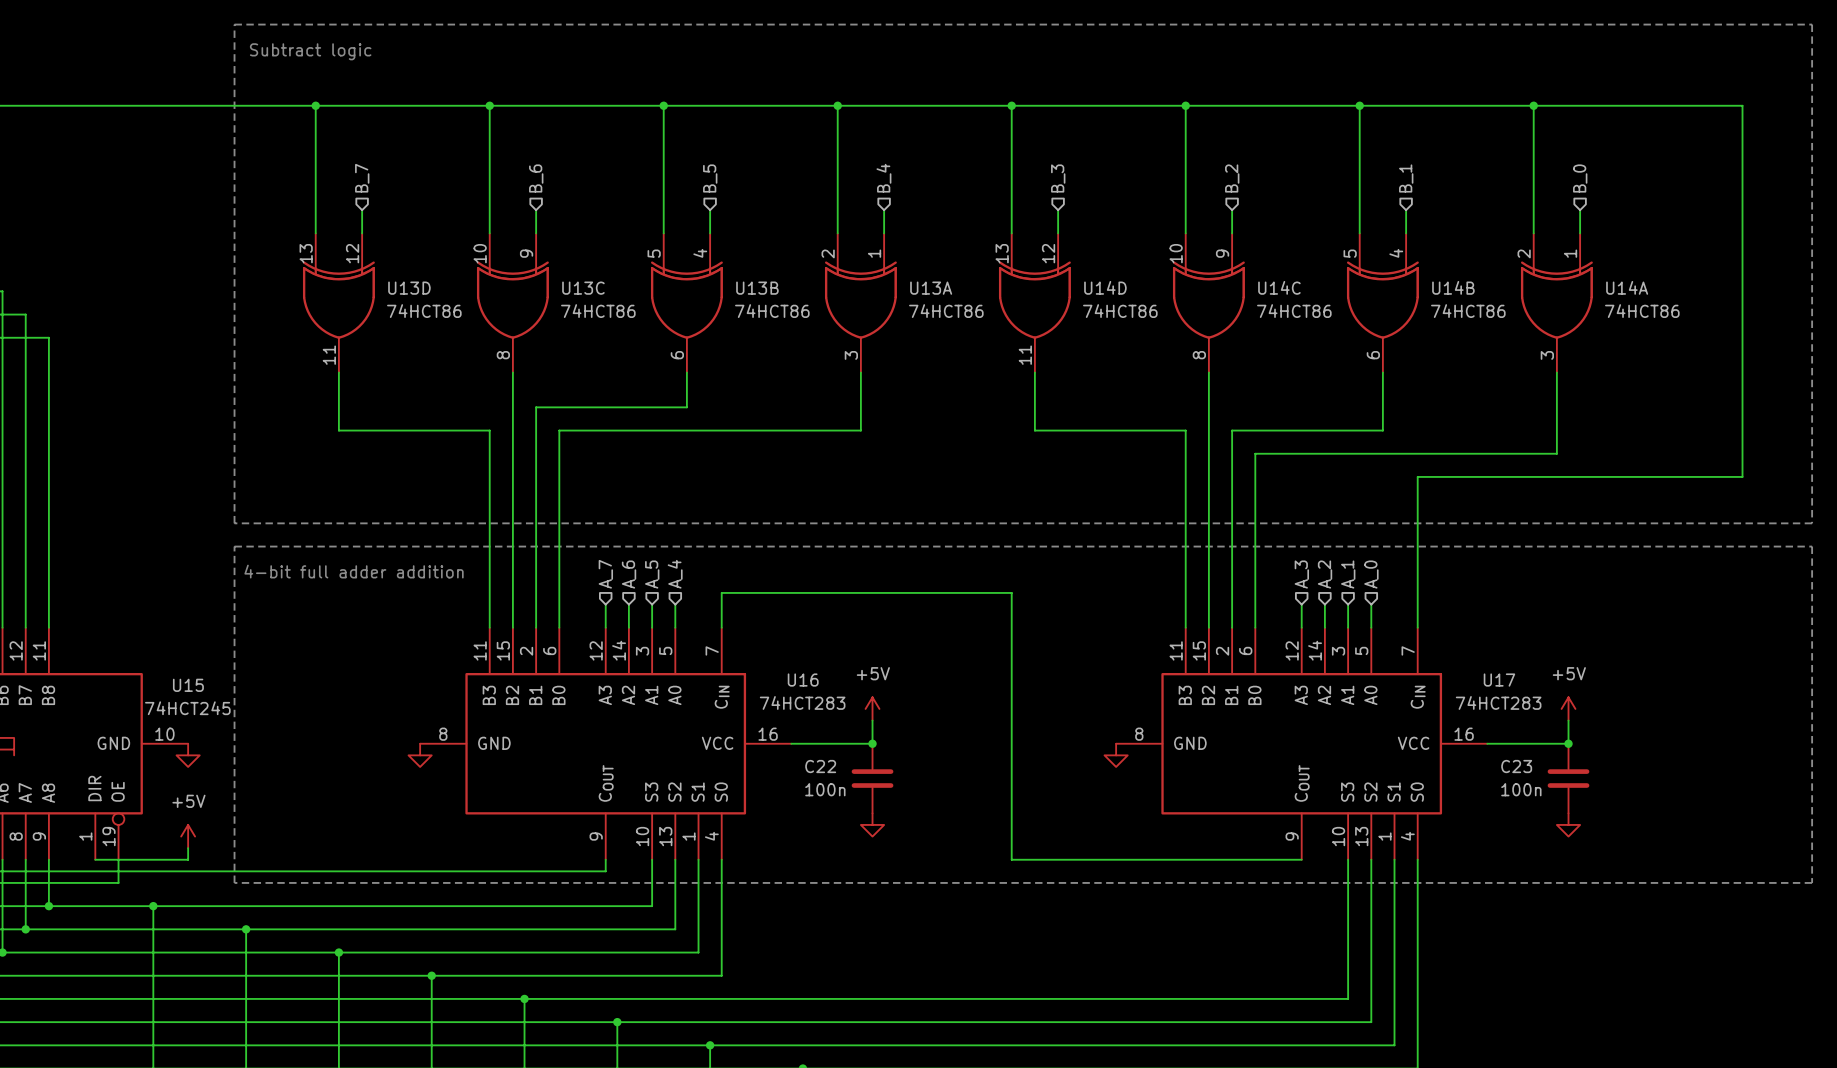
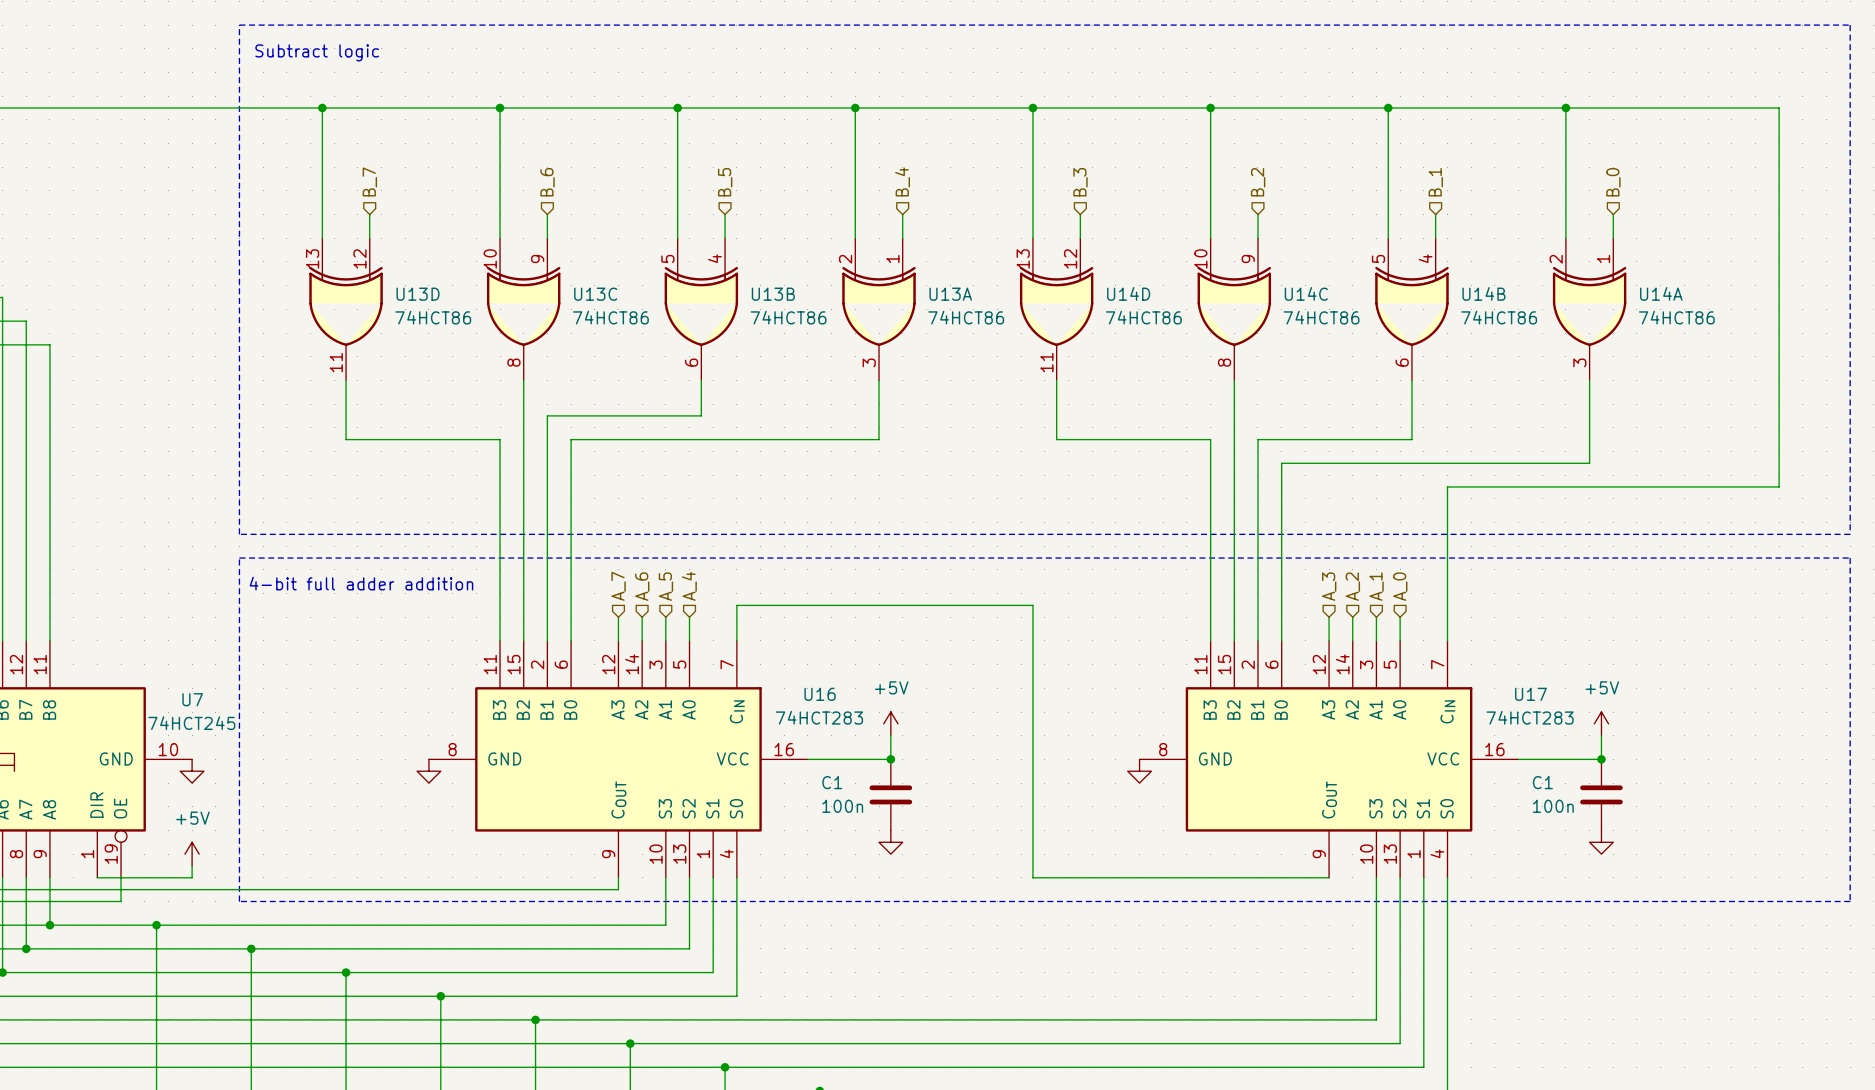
U15 name: U15 (188, 685) -> U7 (192, 699)
C22 name: C22 (820, 766) -> C1 (832, 782)
C23 name: C23 (1516, 766) -> C1 (1542, 782)

